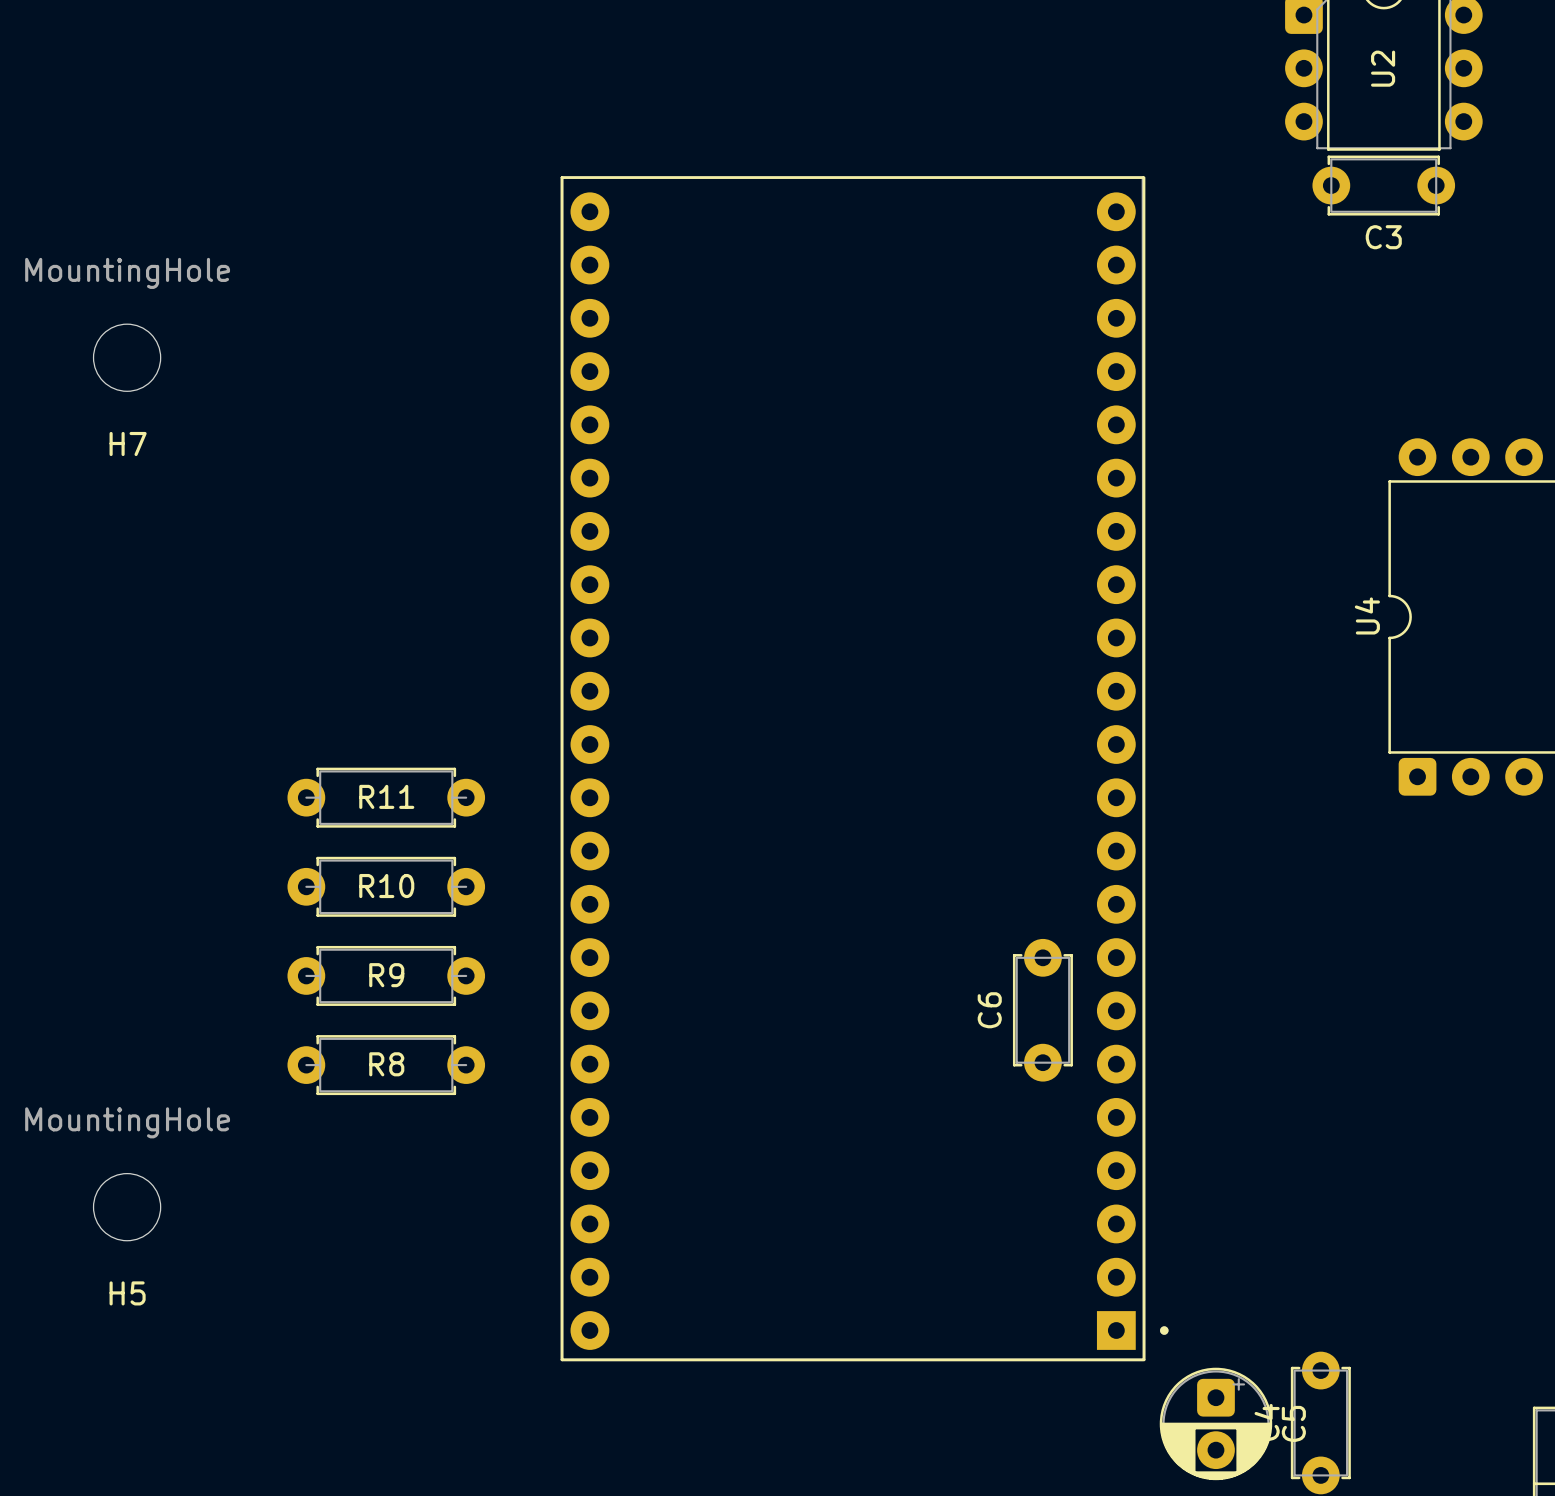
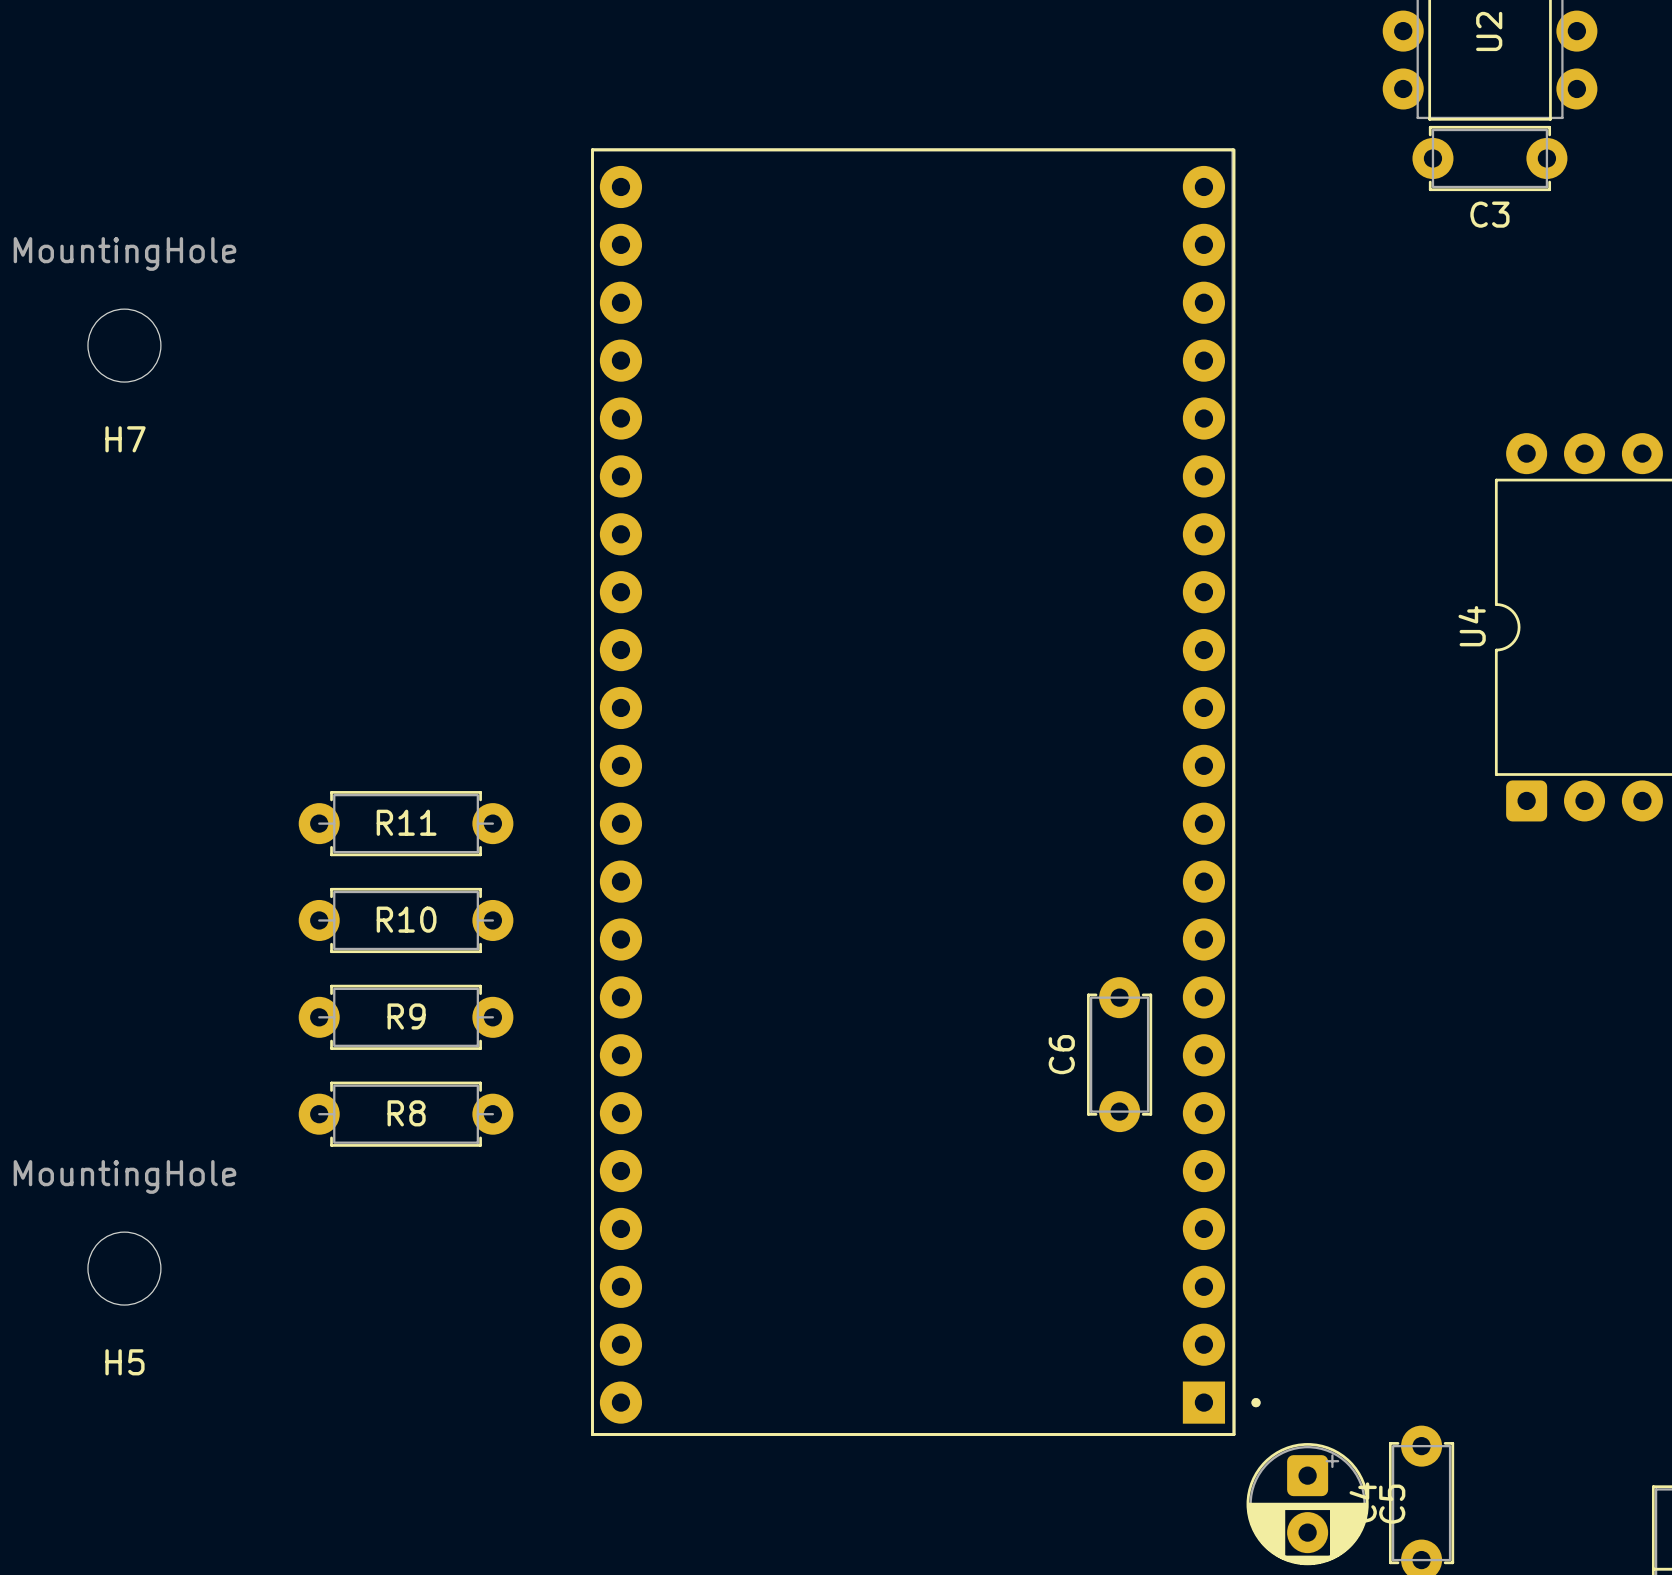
part footprint: [560, 176, 1169, 1362] -> [591, 148, 1261, 1436]

